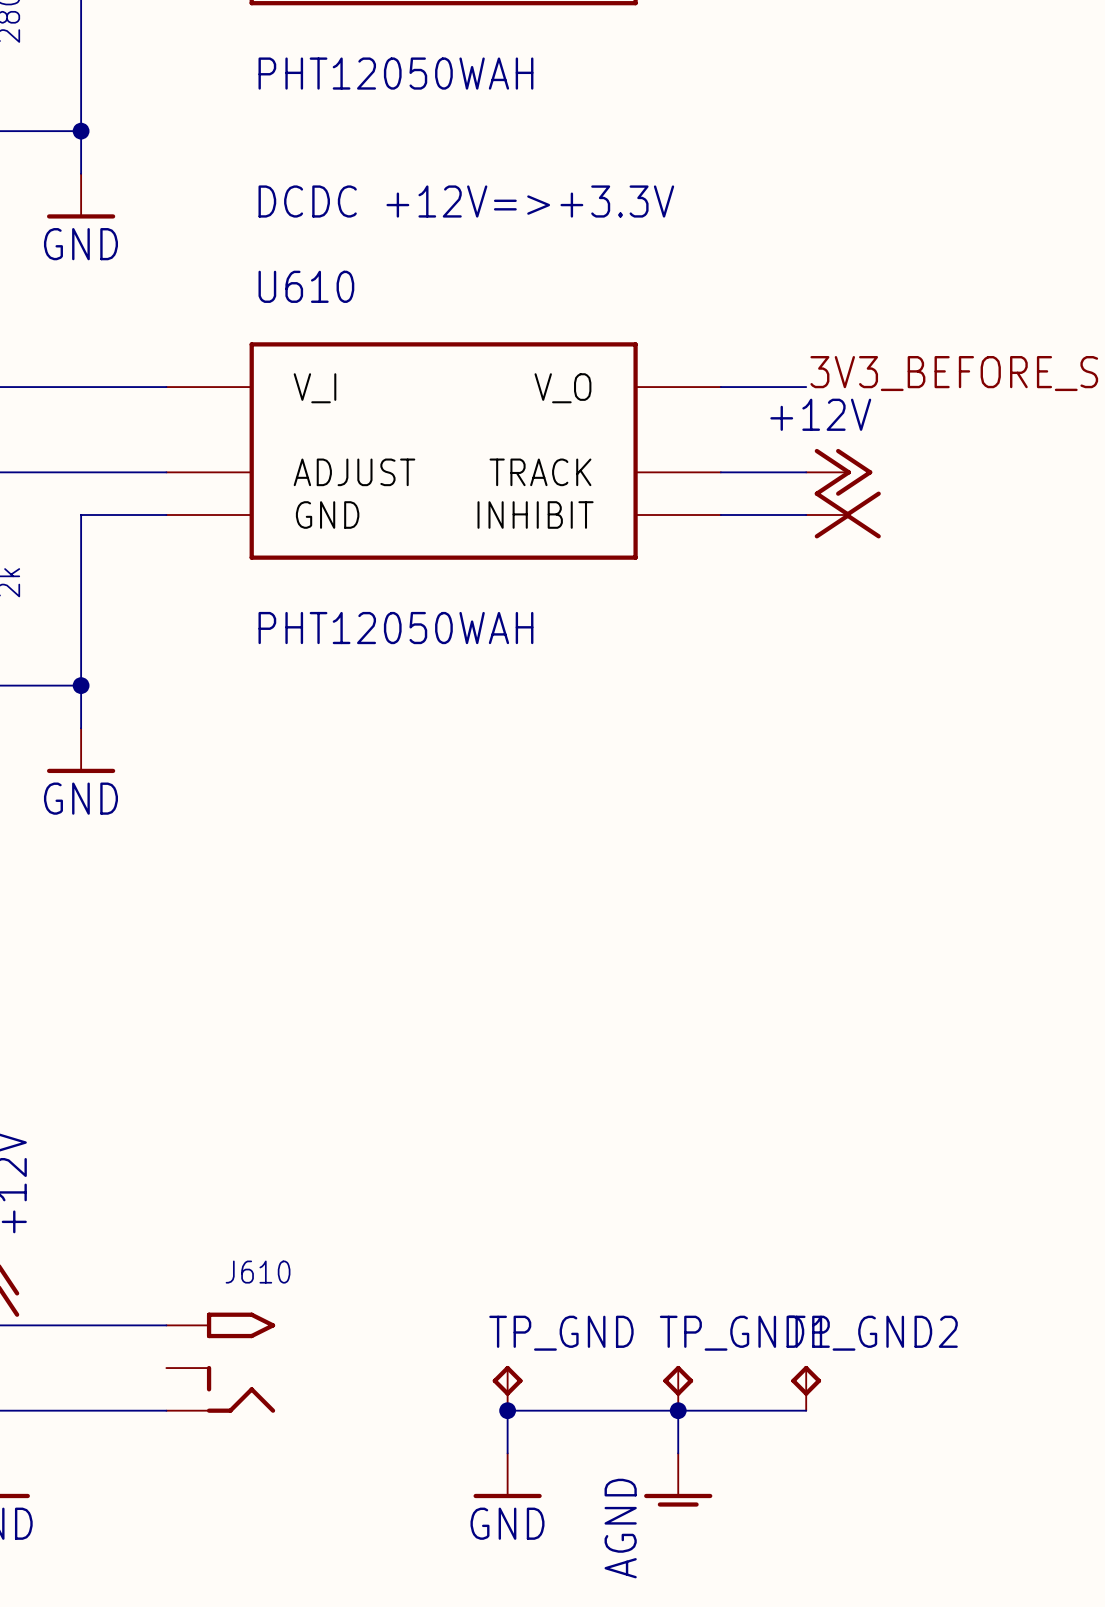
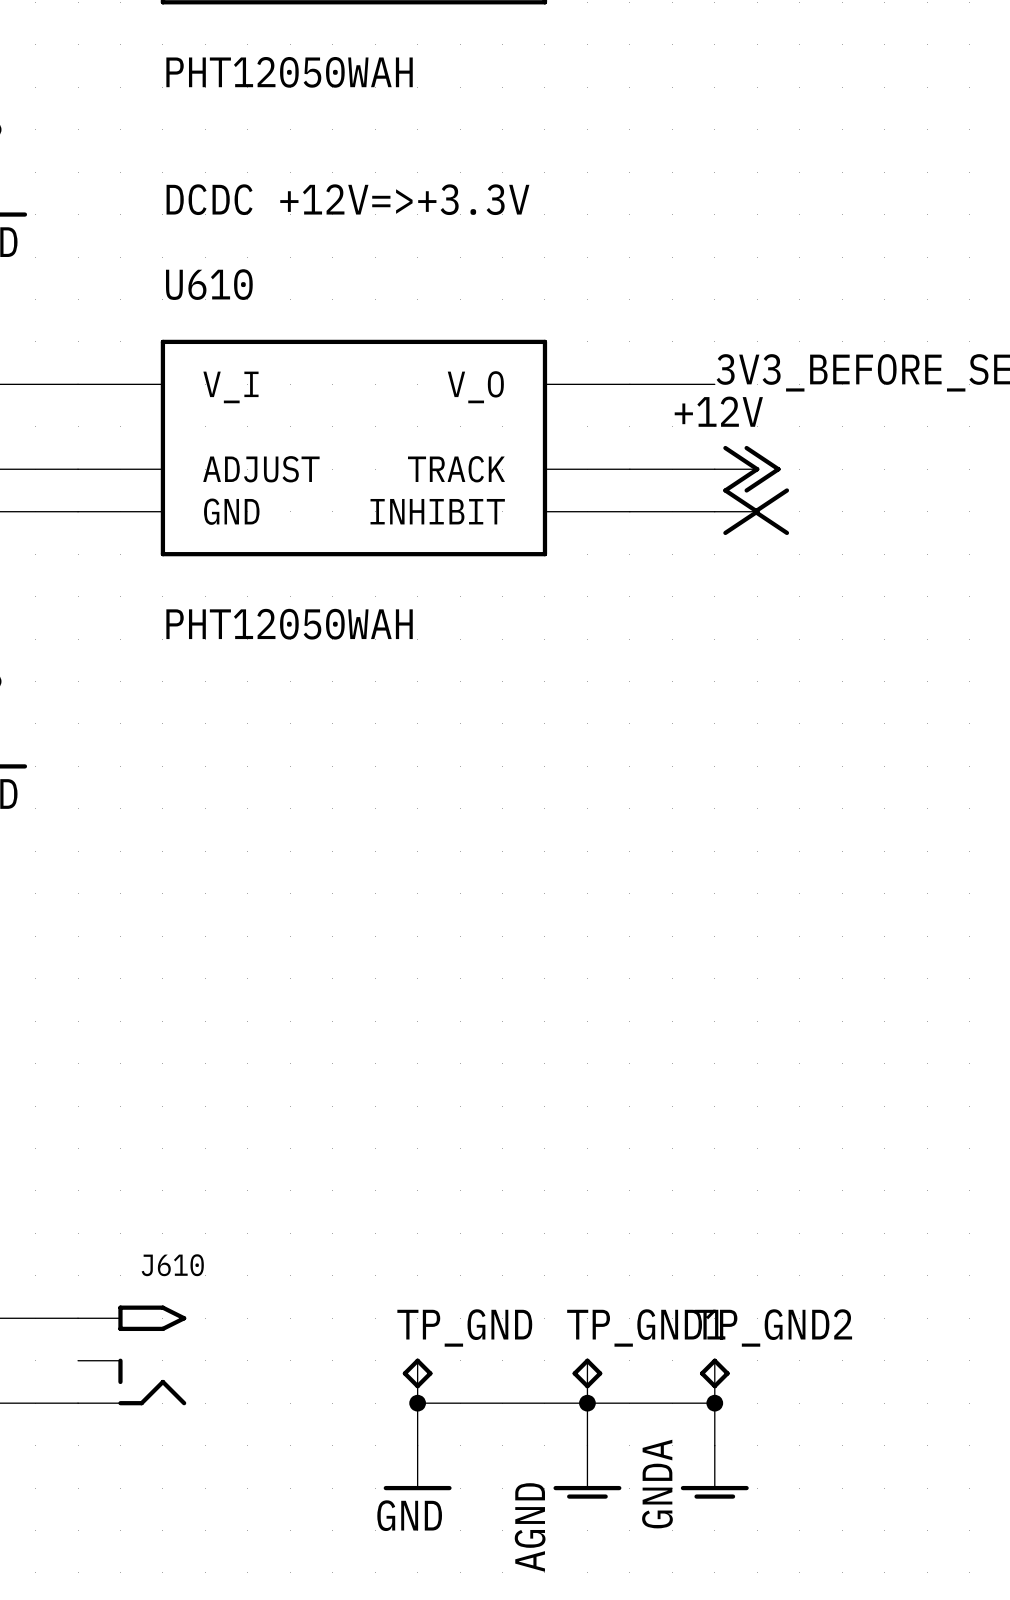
wire: none -> (714, 1403) (714, 1445)
junction: none -> (714, 1403)
power symbol: none -> GNDA (714, 1472)

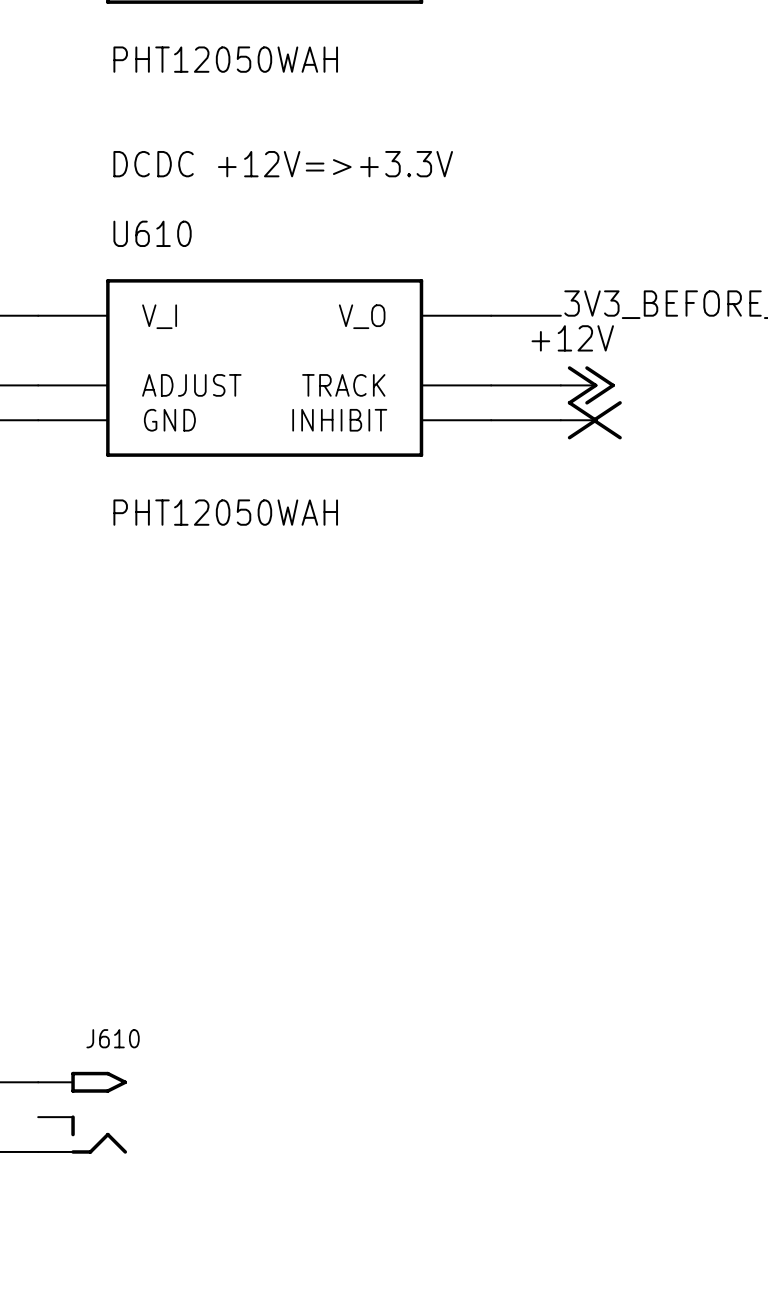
TP_GND: (417, 1380) -> none
TP_GND1: (587, 1380) -> none
TP_GND2: (714, 1380) -> none
junction: (417, 1403) -> none
wire: (587, 1403) (587, 1445) -> none
junction: (587, 1403) -> none
junction: (714, 1403) -> none
wire: (417, 1445) (417, 1403) (714, 1403) (714, 1445) -> none
power symbol: GND (417, 1467) -> none
power symbol: AGND (587, 1472) -> none
power symbol: GNDA (714, 1472) -> none

